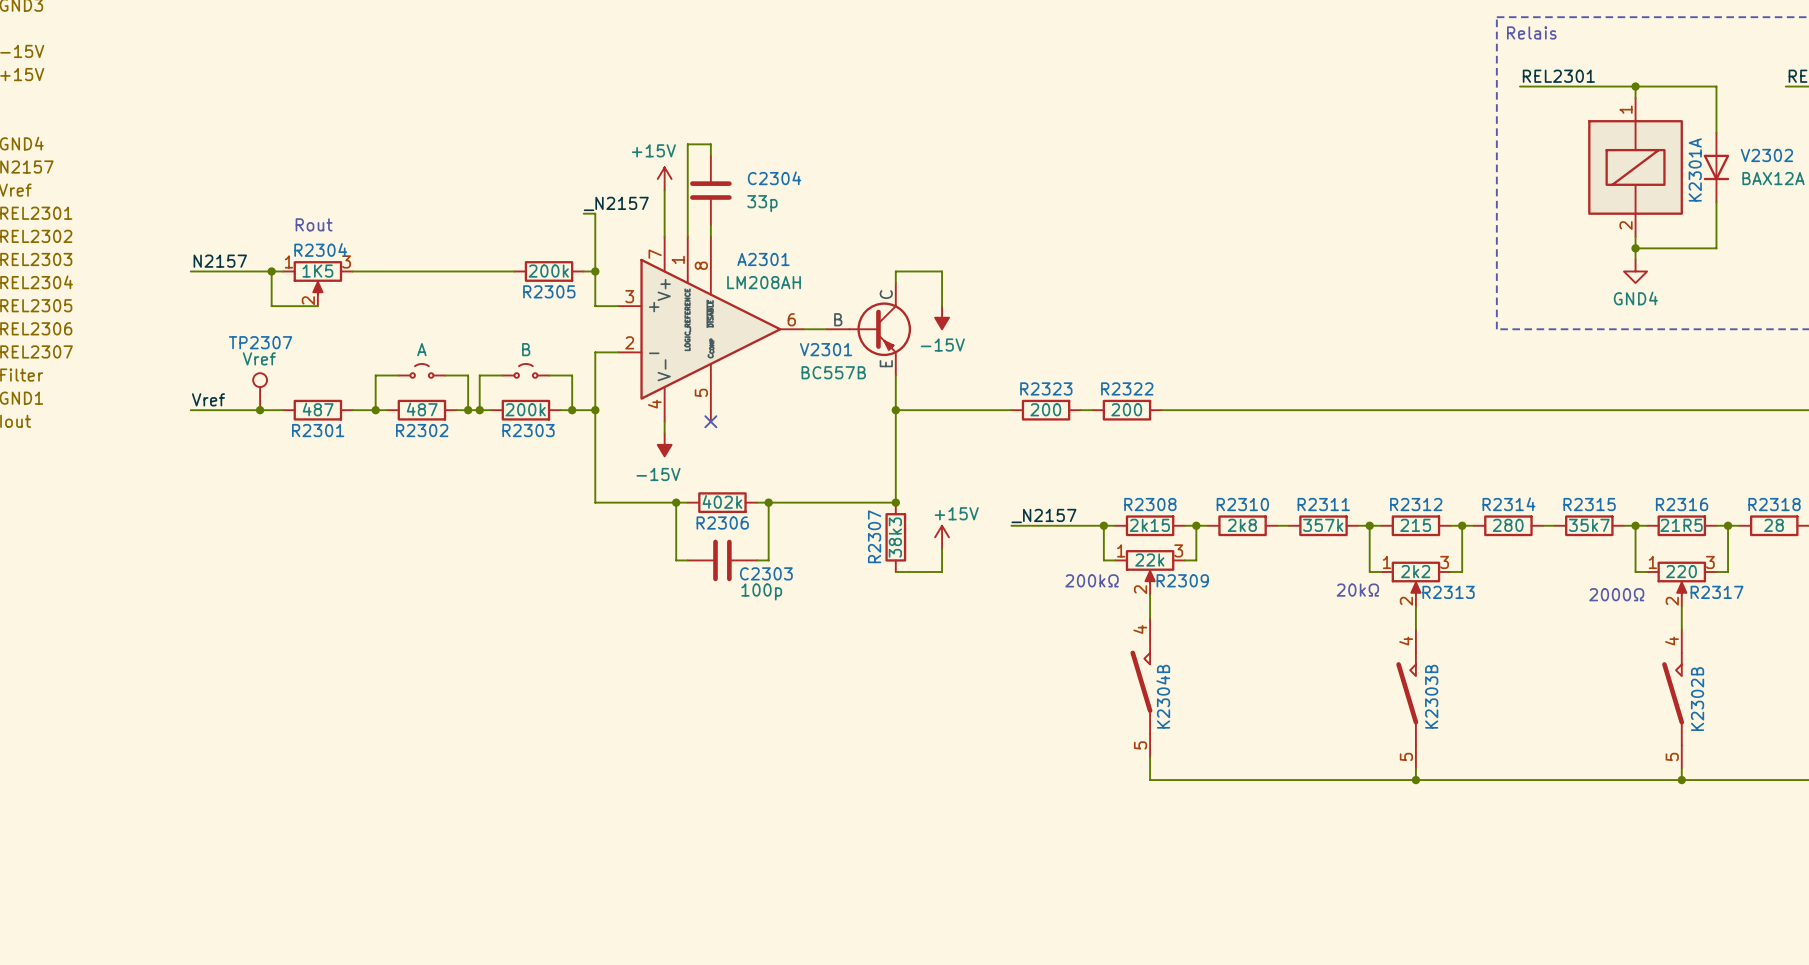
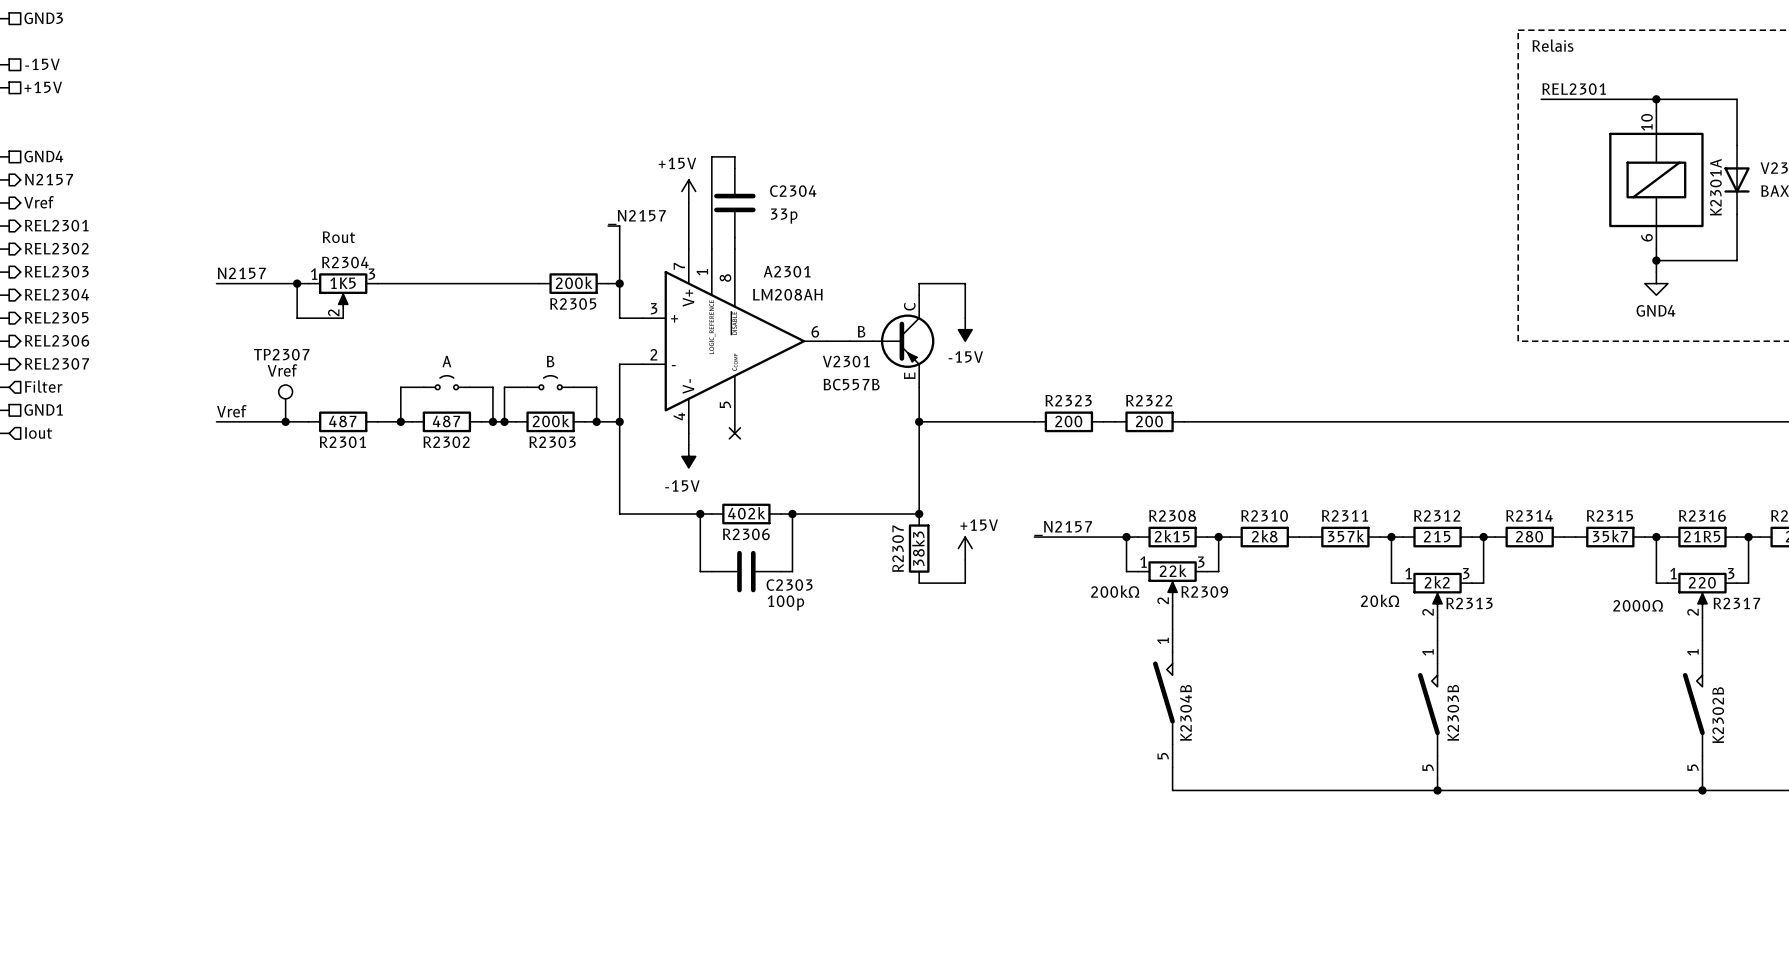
K2301A pin number: 1 (1626, 109) -> 10 (1646, 122)
K2301A pin number: 2 (1626, 225) -> 6 (1646, 237)
K2304B pin number: 4 (1140, 629) -> 1 (1163, 640)
K2303B pin number: 4 (1406, 641) -> 1 (1428, 652)
K2302B pin number: 4 (1671, 641) -> 1 (1692, 652)

